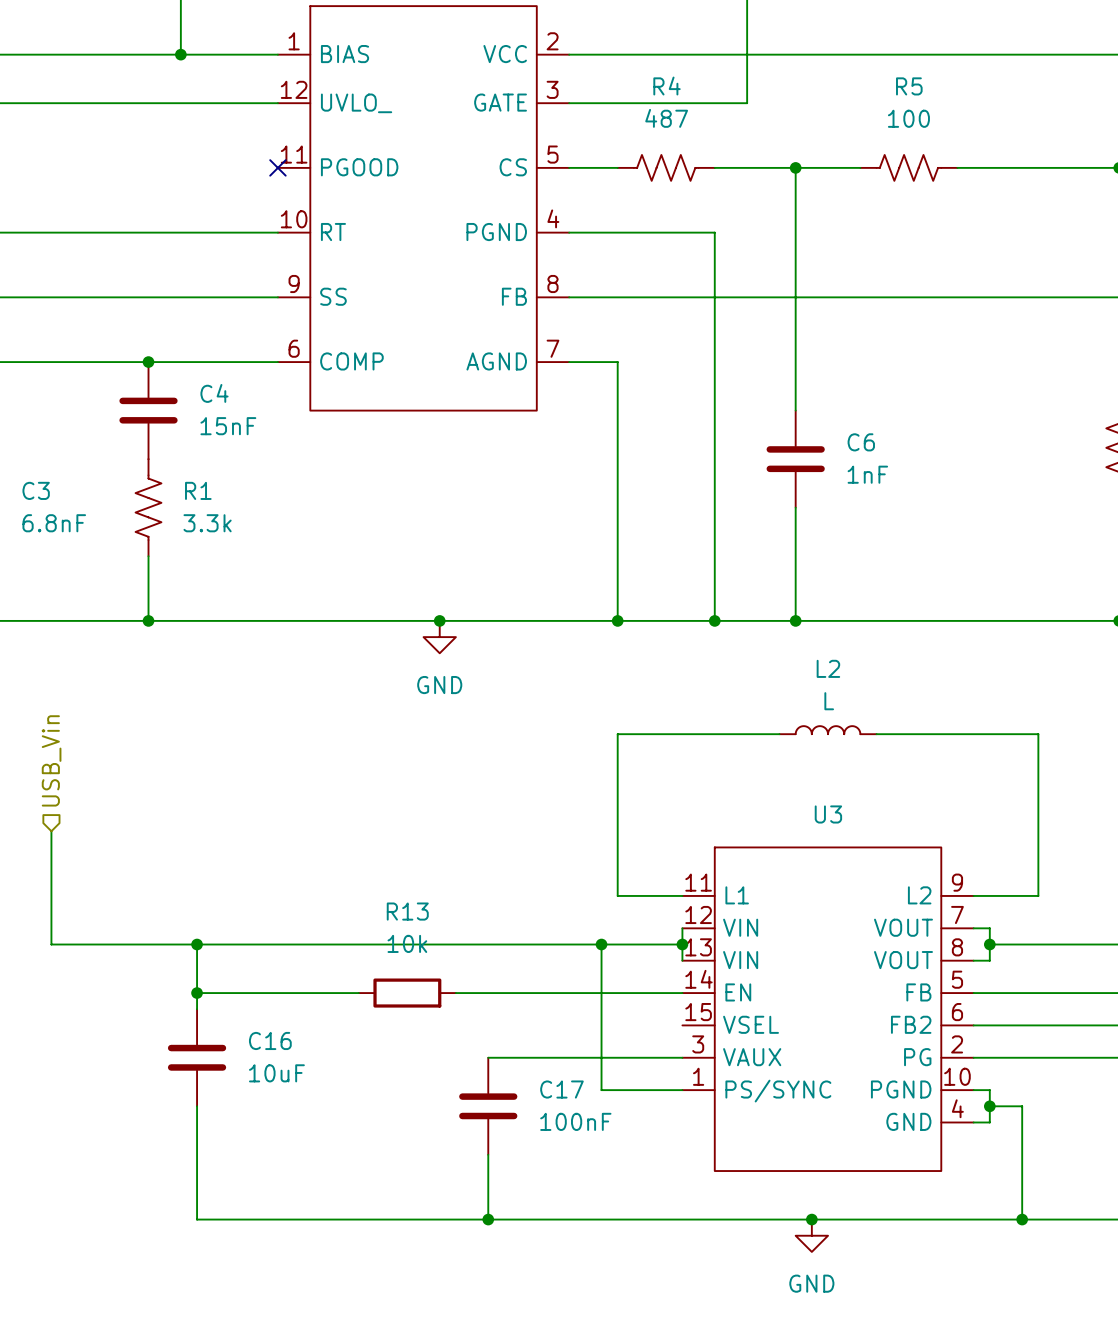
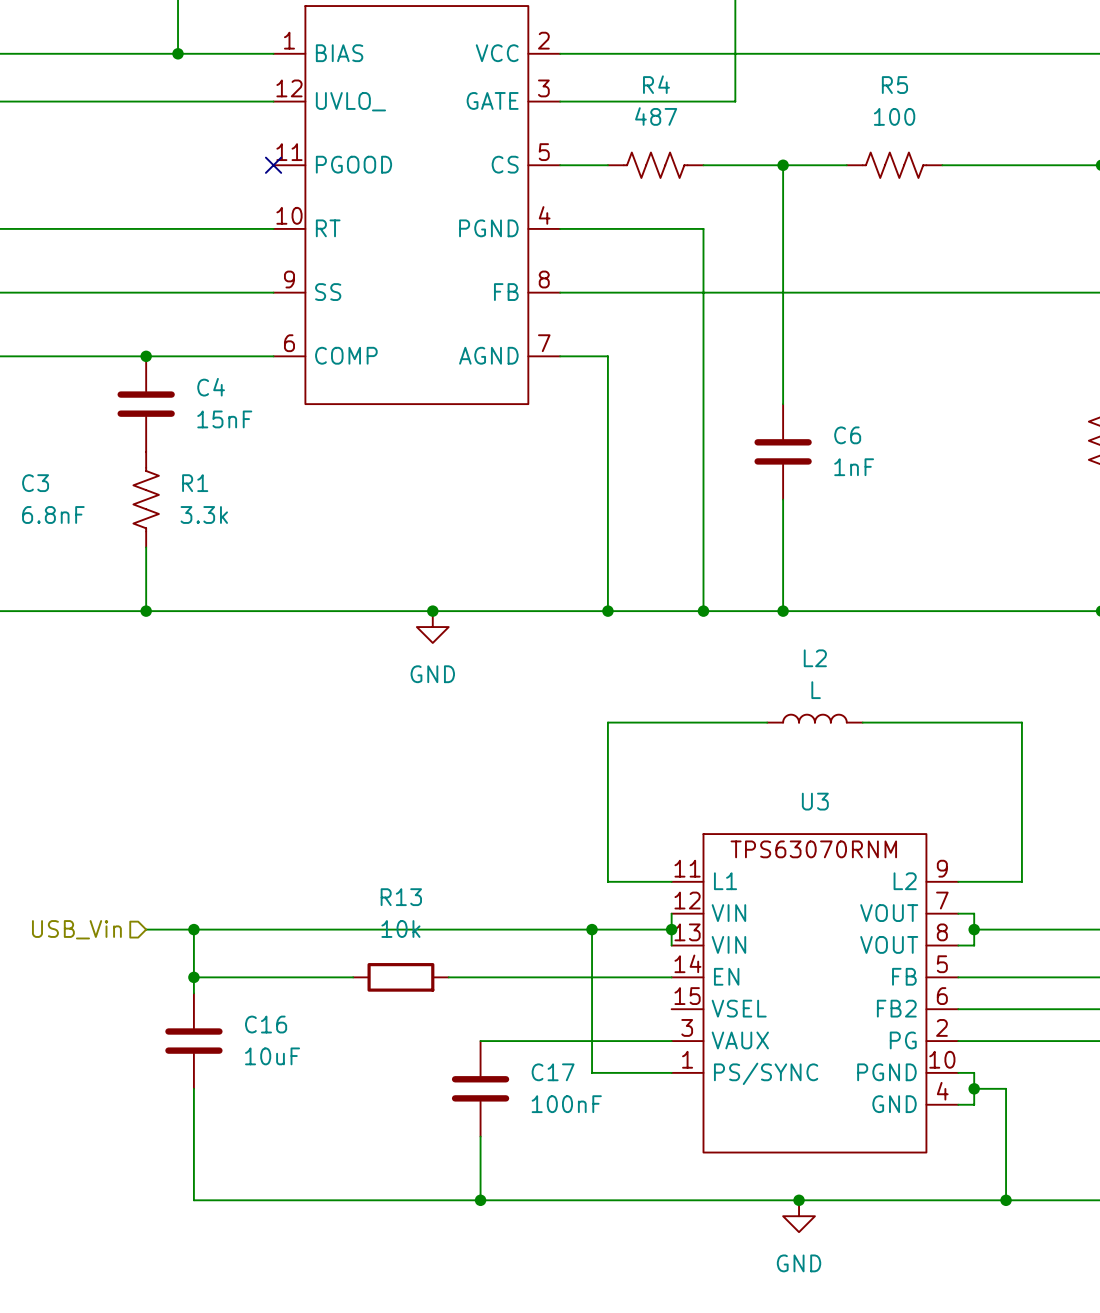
hierarchical label rotation: 0° (51, 760) -> 90° counterclockwise (76, 929)
hierarchical label position: USB_Vin (51, 760) -> USB_Vin (76, 929)
wire: (51, 831) (51, 944) (148, 944) -> none
U3 text: none -> TPS63070RNM (813, 849)

